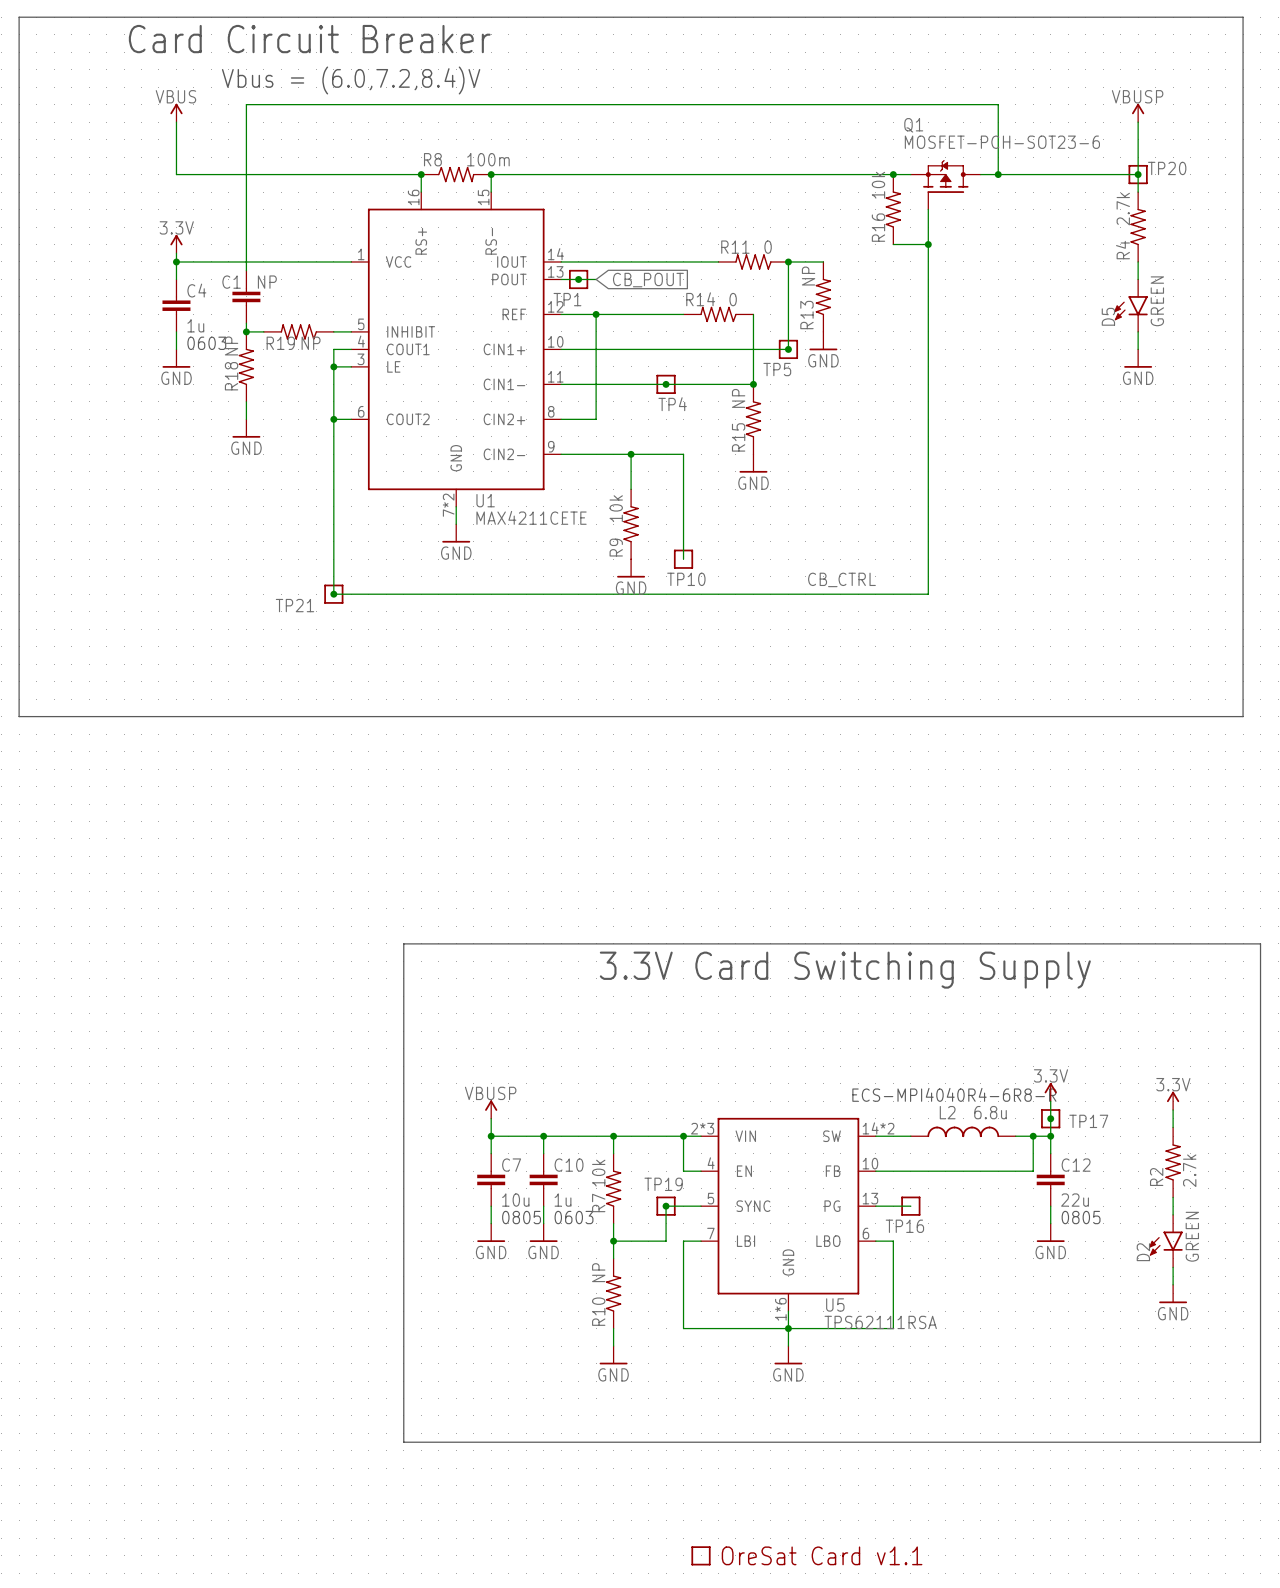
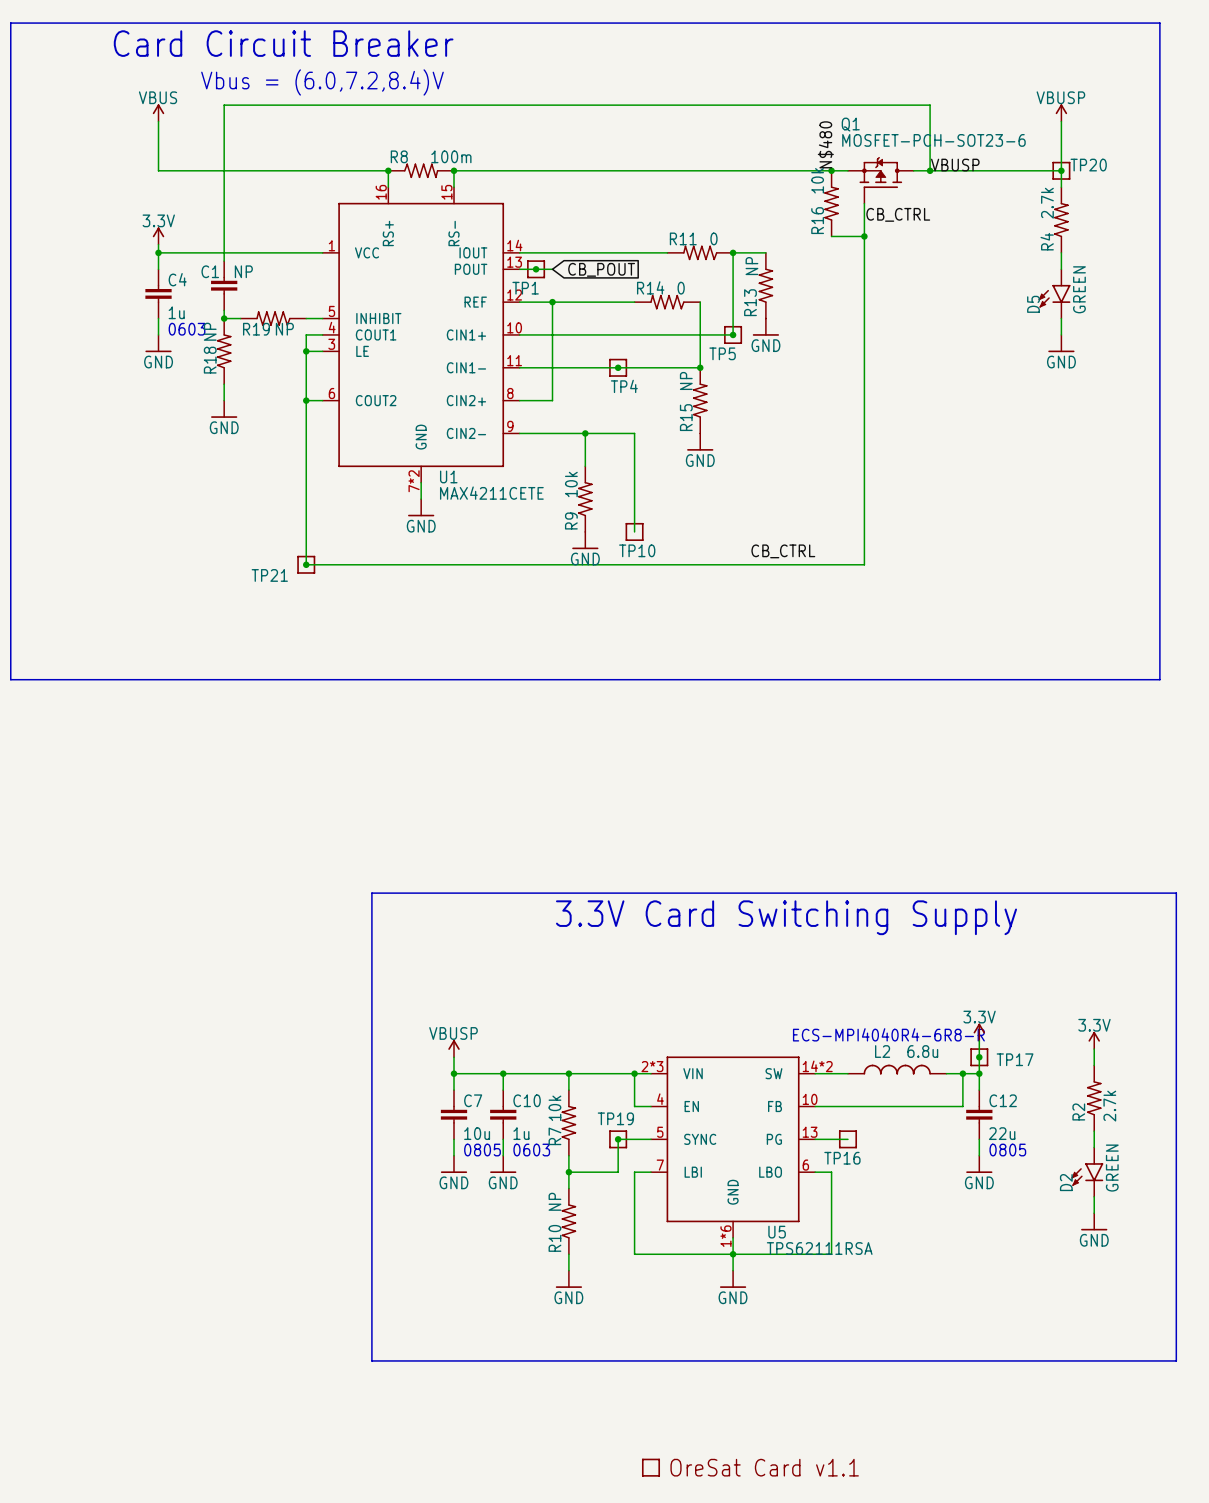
label: none -> N$480 (825, 144)
label: none -> VBUSP (955, 165)
label: none -> CB_CTRL (898, 214)

